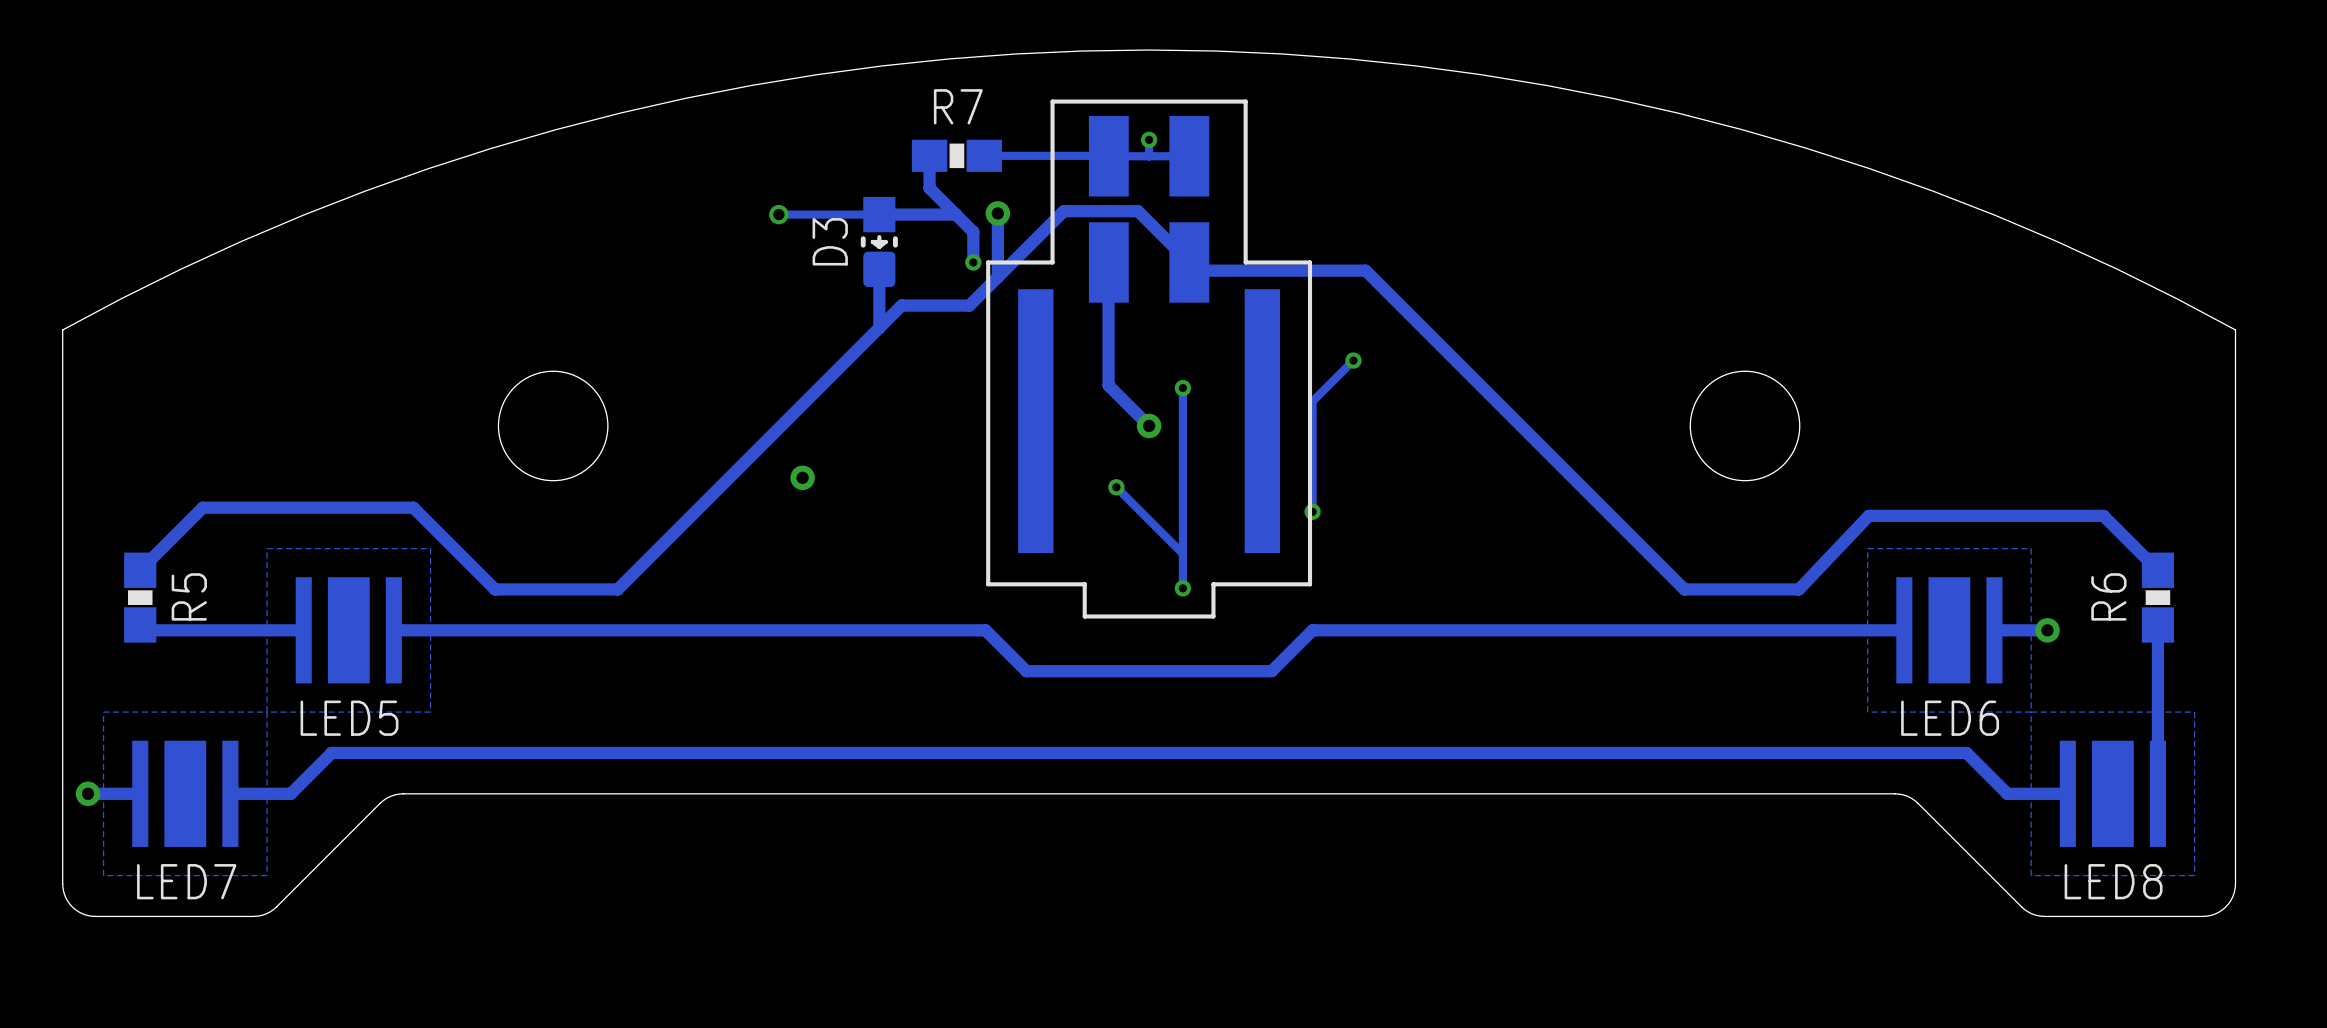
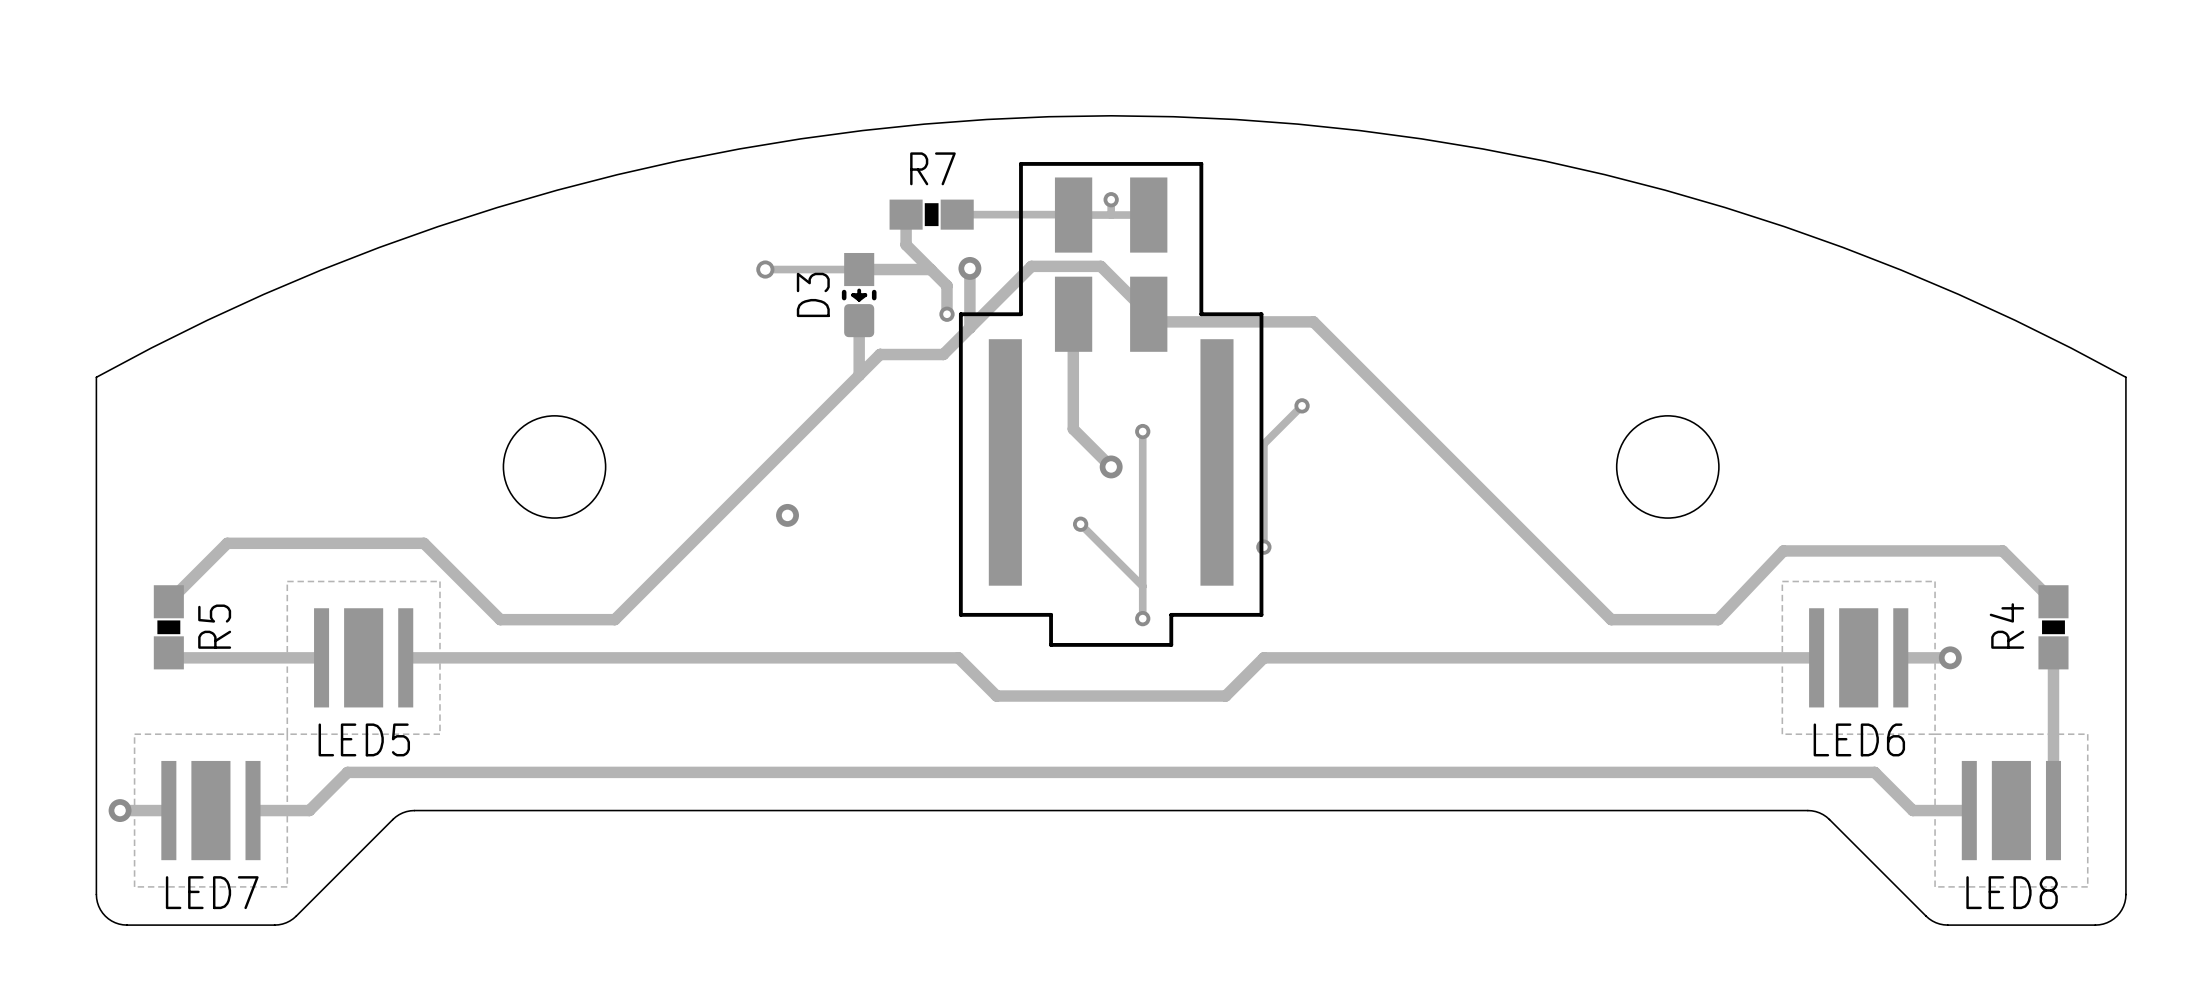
R6 name: R6 (2108, 596) -> none
R4: none -> (2006, 625)

